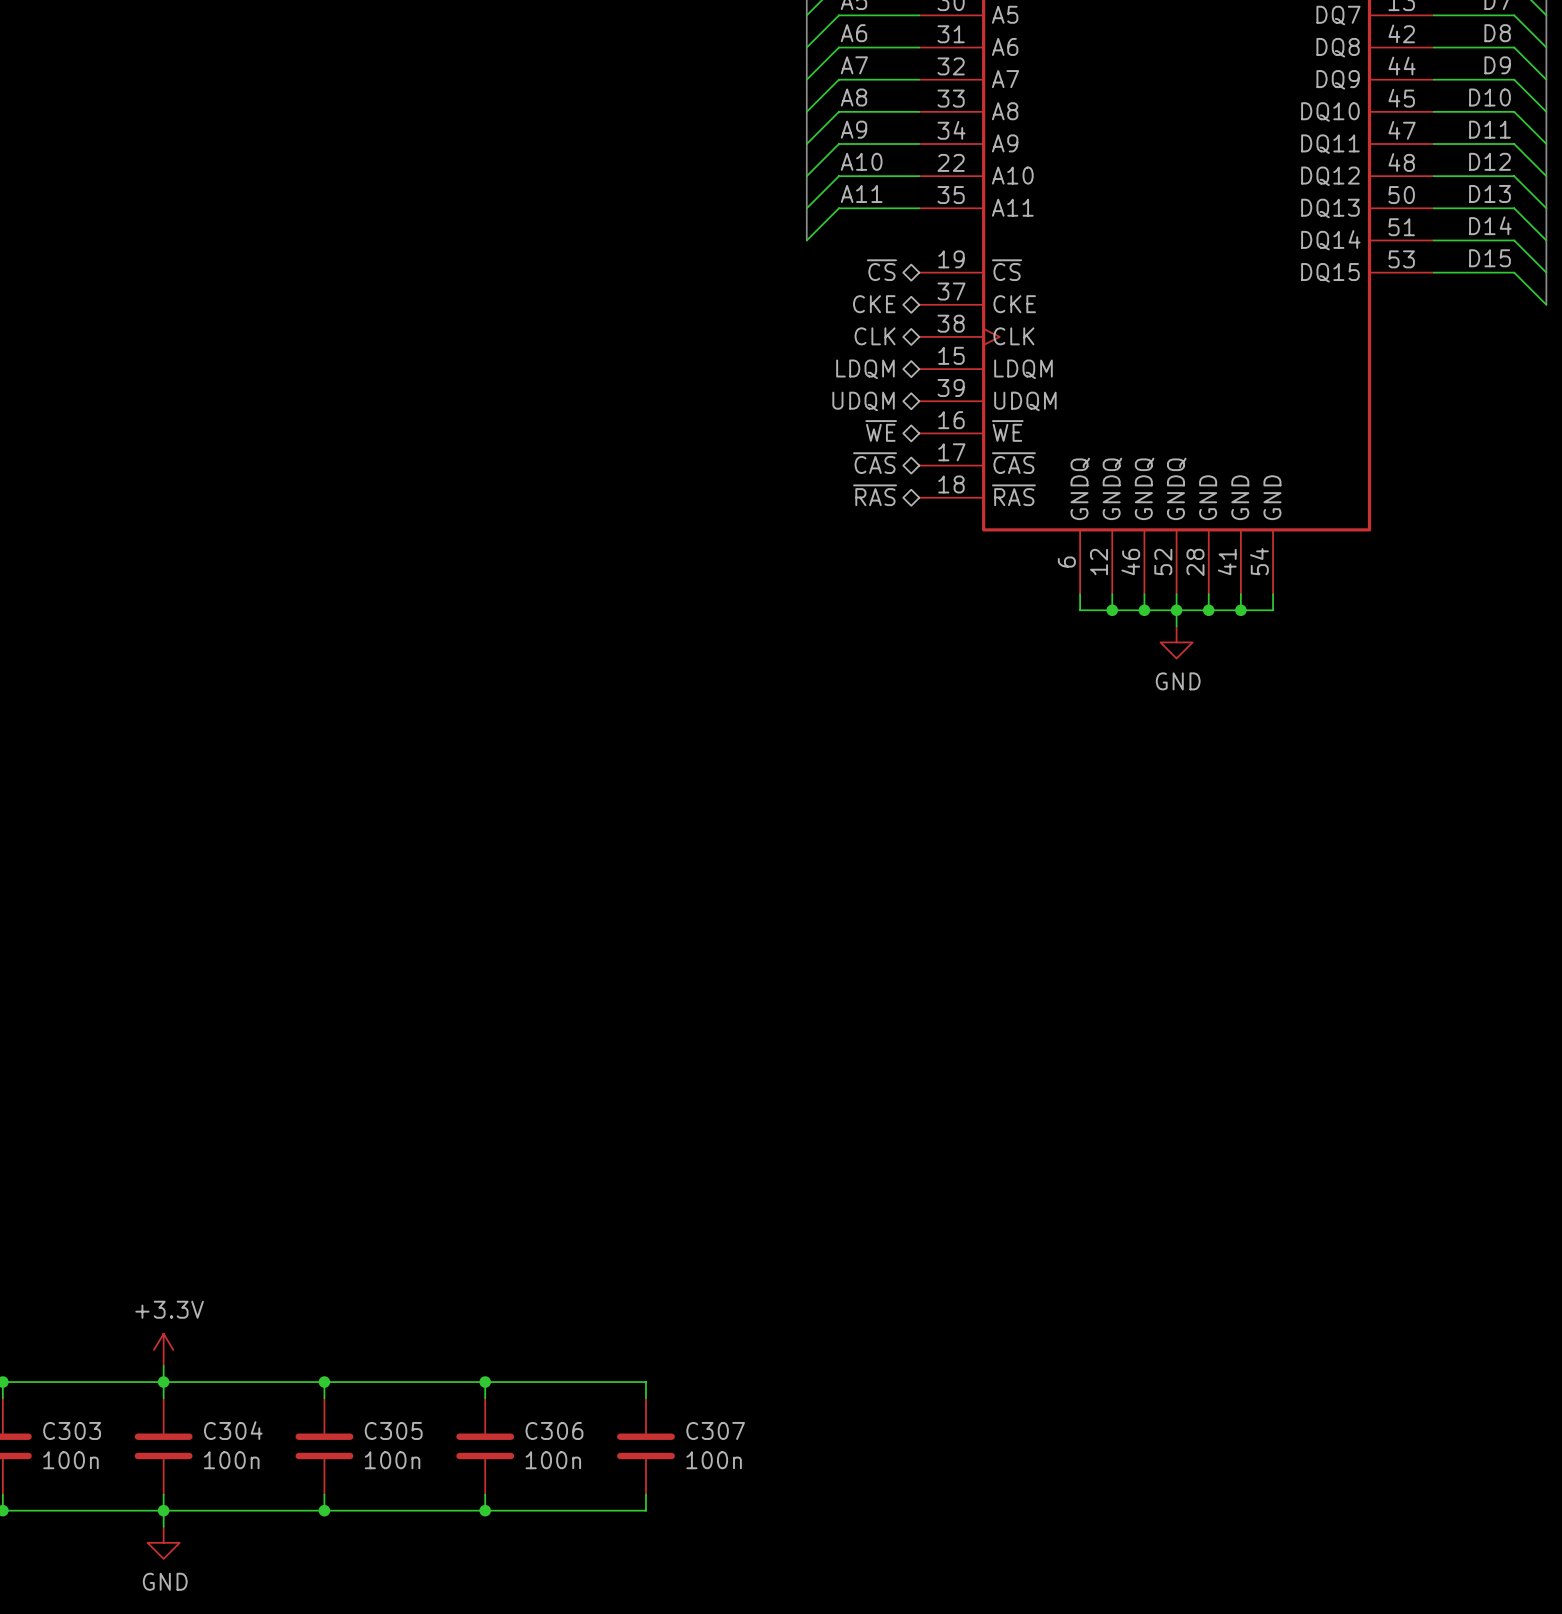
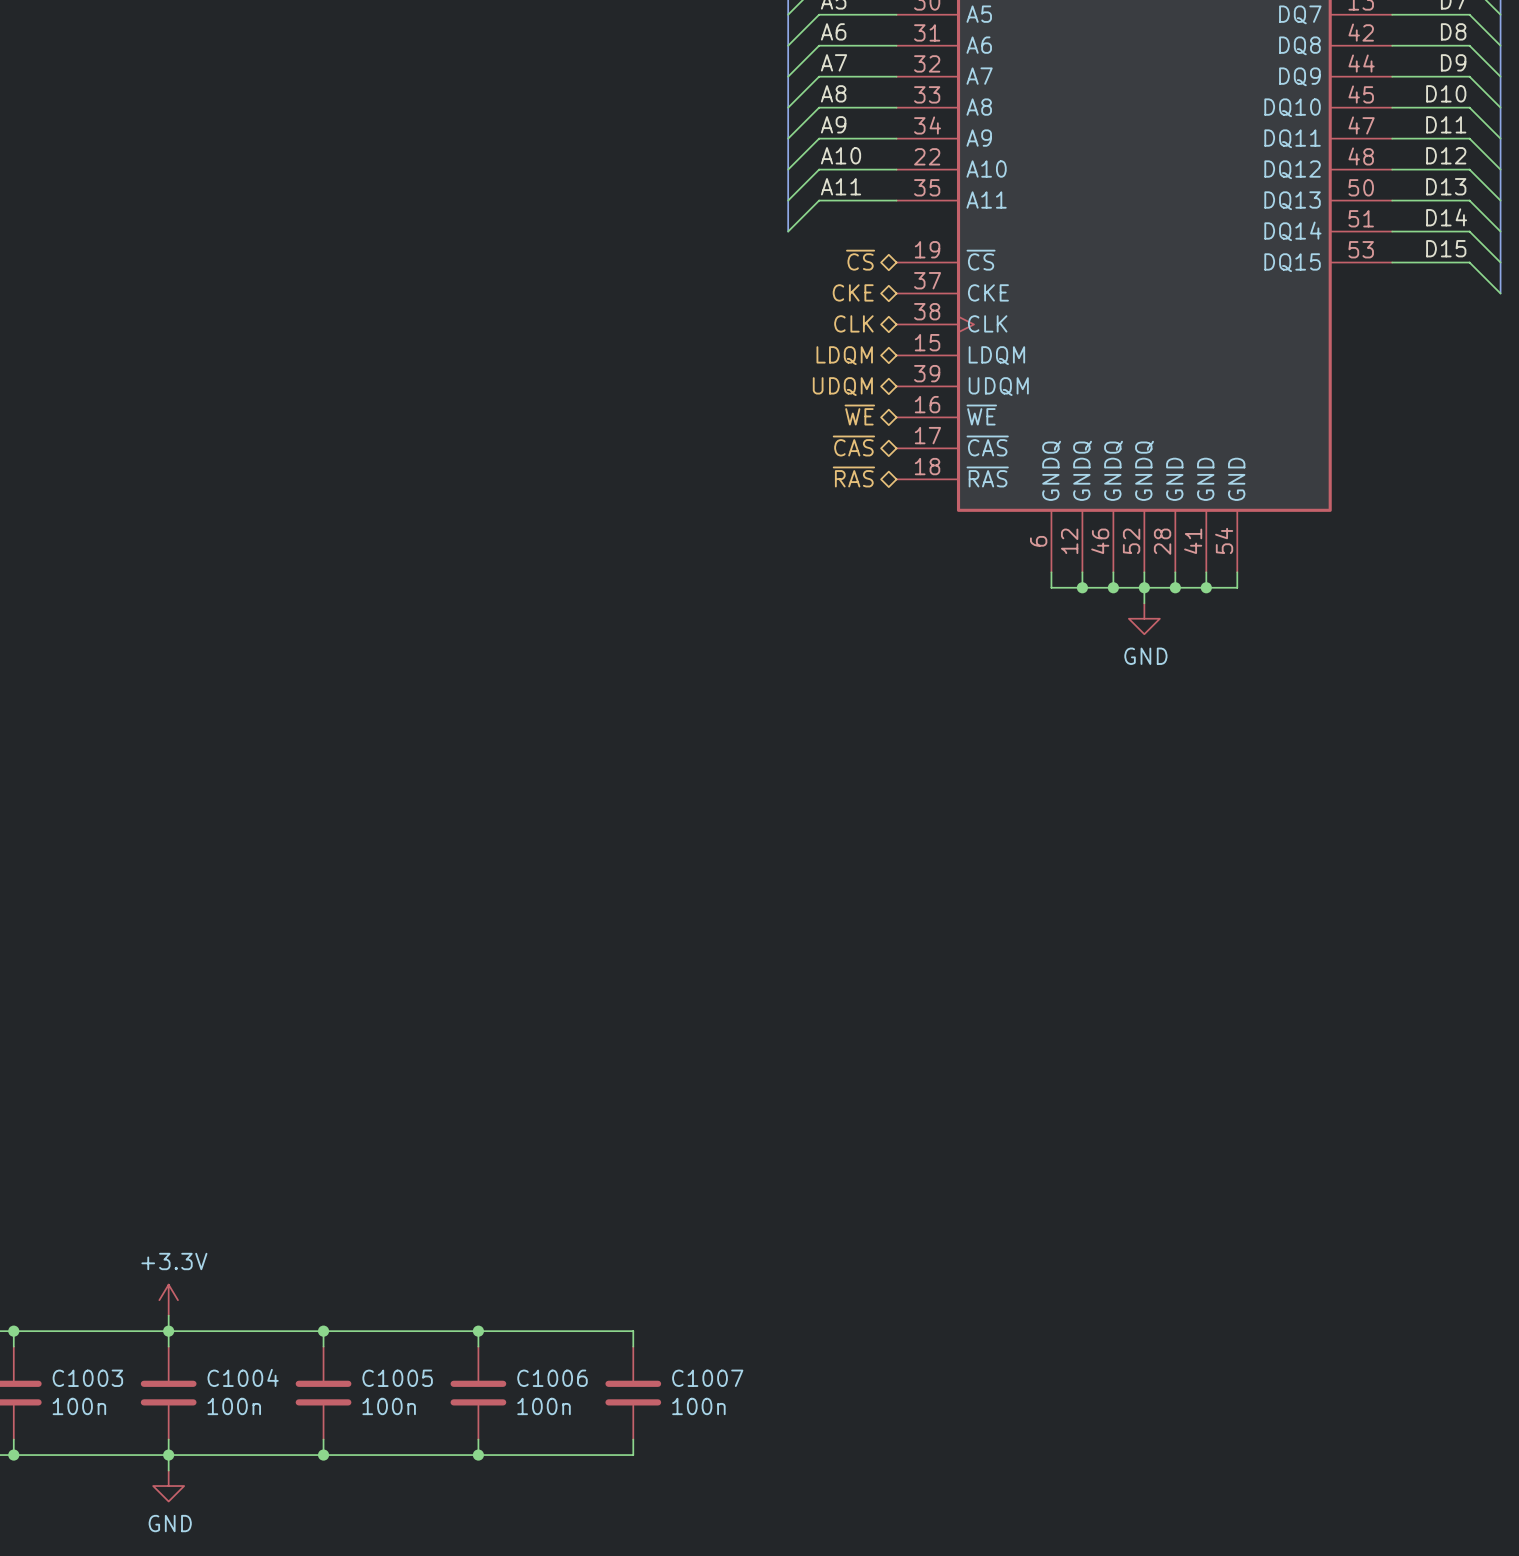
C303 name: C303 (72, 1430) -> C1003 (87, 1378)
C304 name: C304 (233, 1430) -> C1004 (243, 1377)
C305 name: C305 (393, 1430) -> C1005 (397, 1378)
C306 name: C306 (554, 1430) -> C1006 (552, 1378)
C307 name: C307 (715, 1430) -> C1007 (707, 1378)

